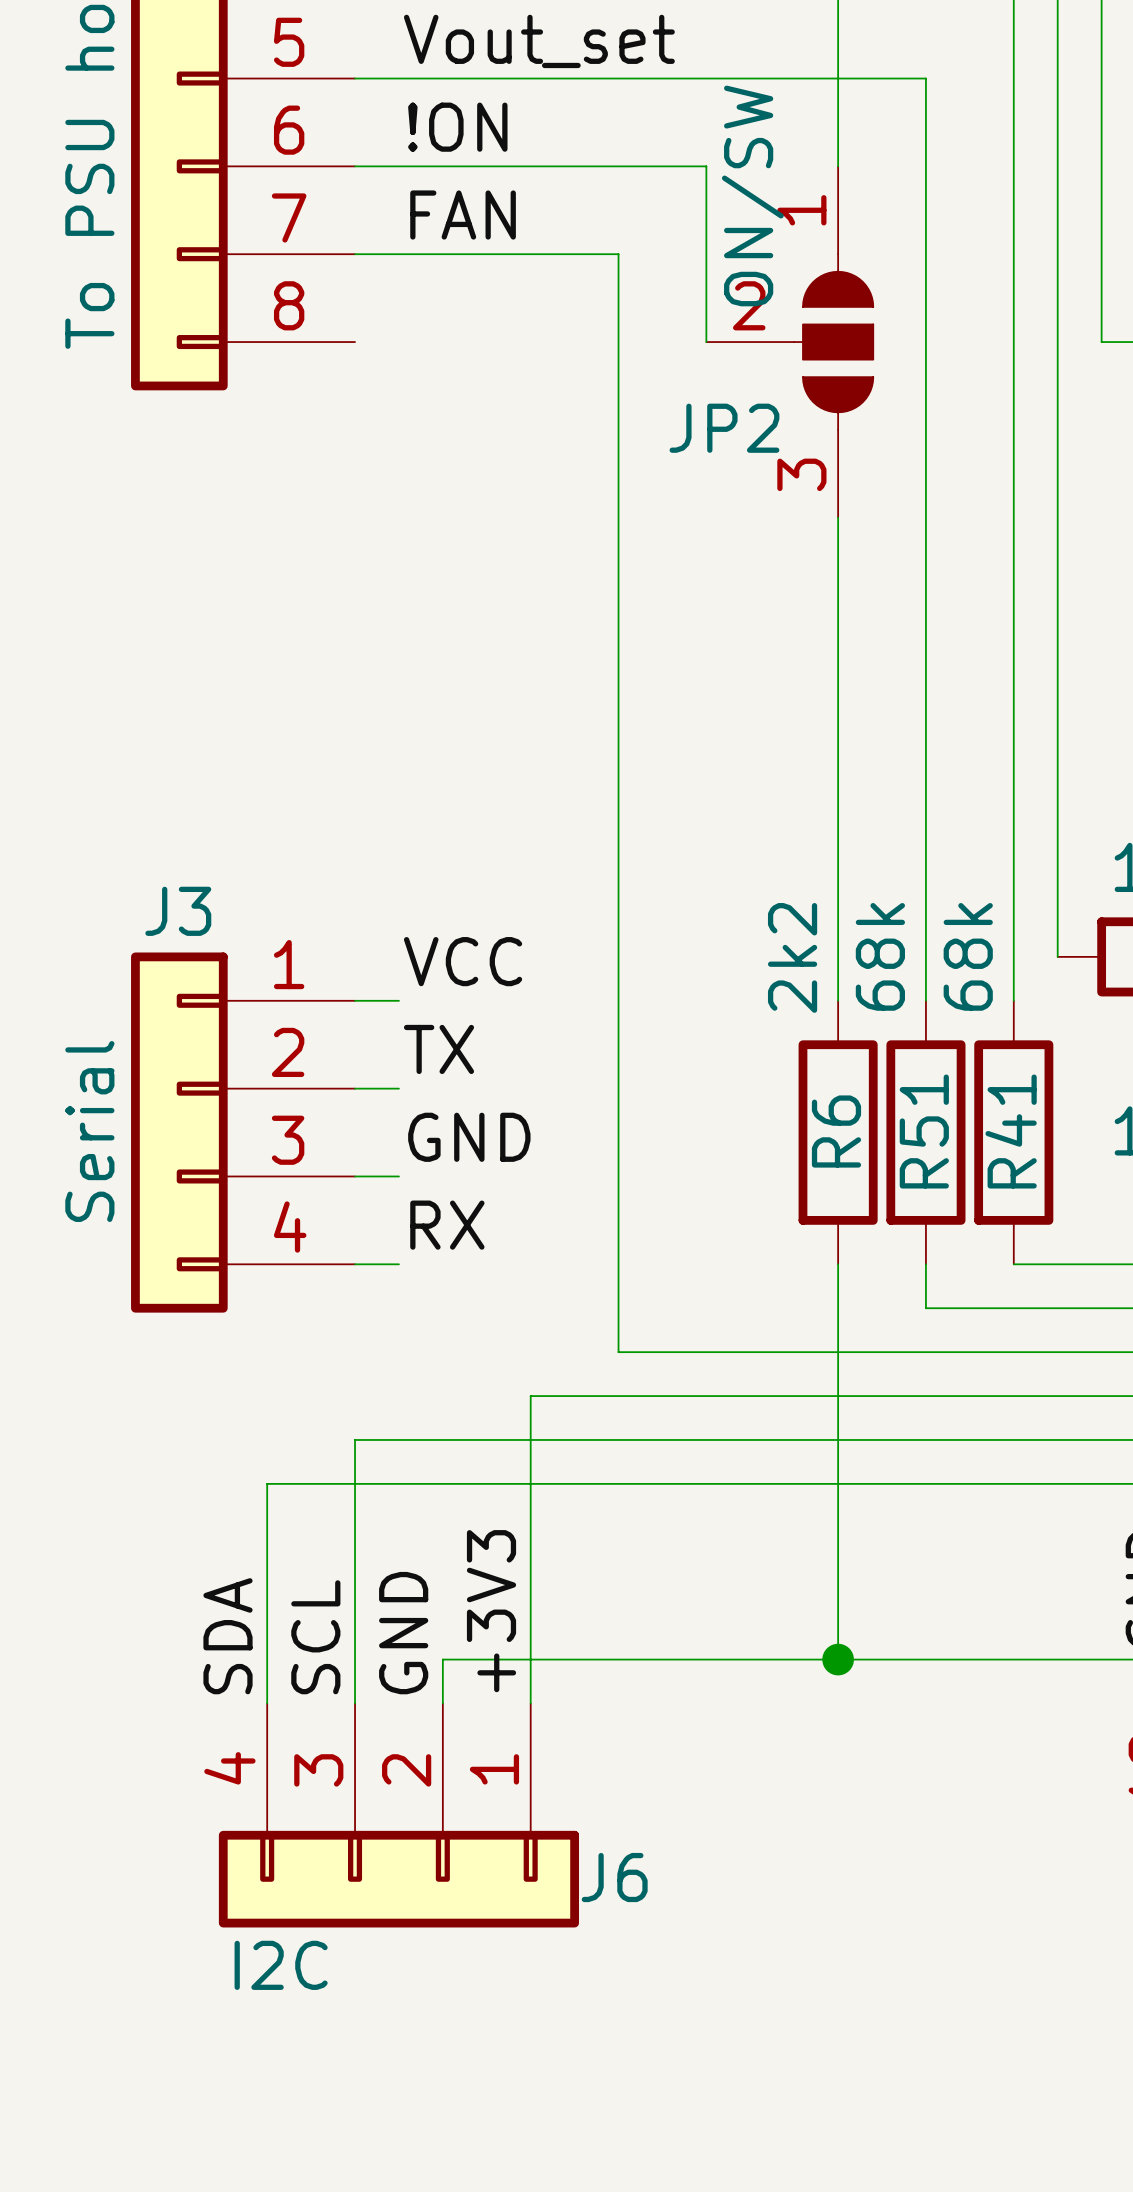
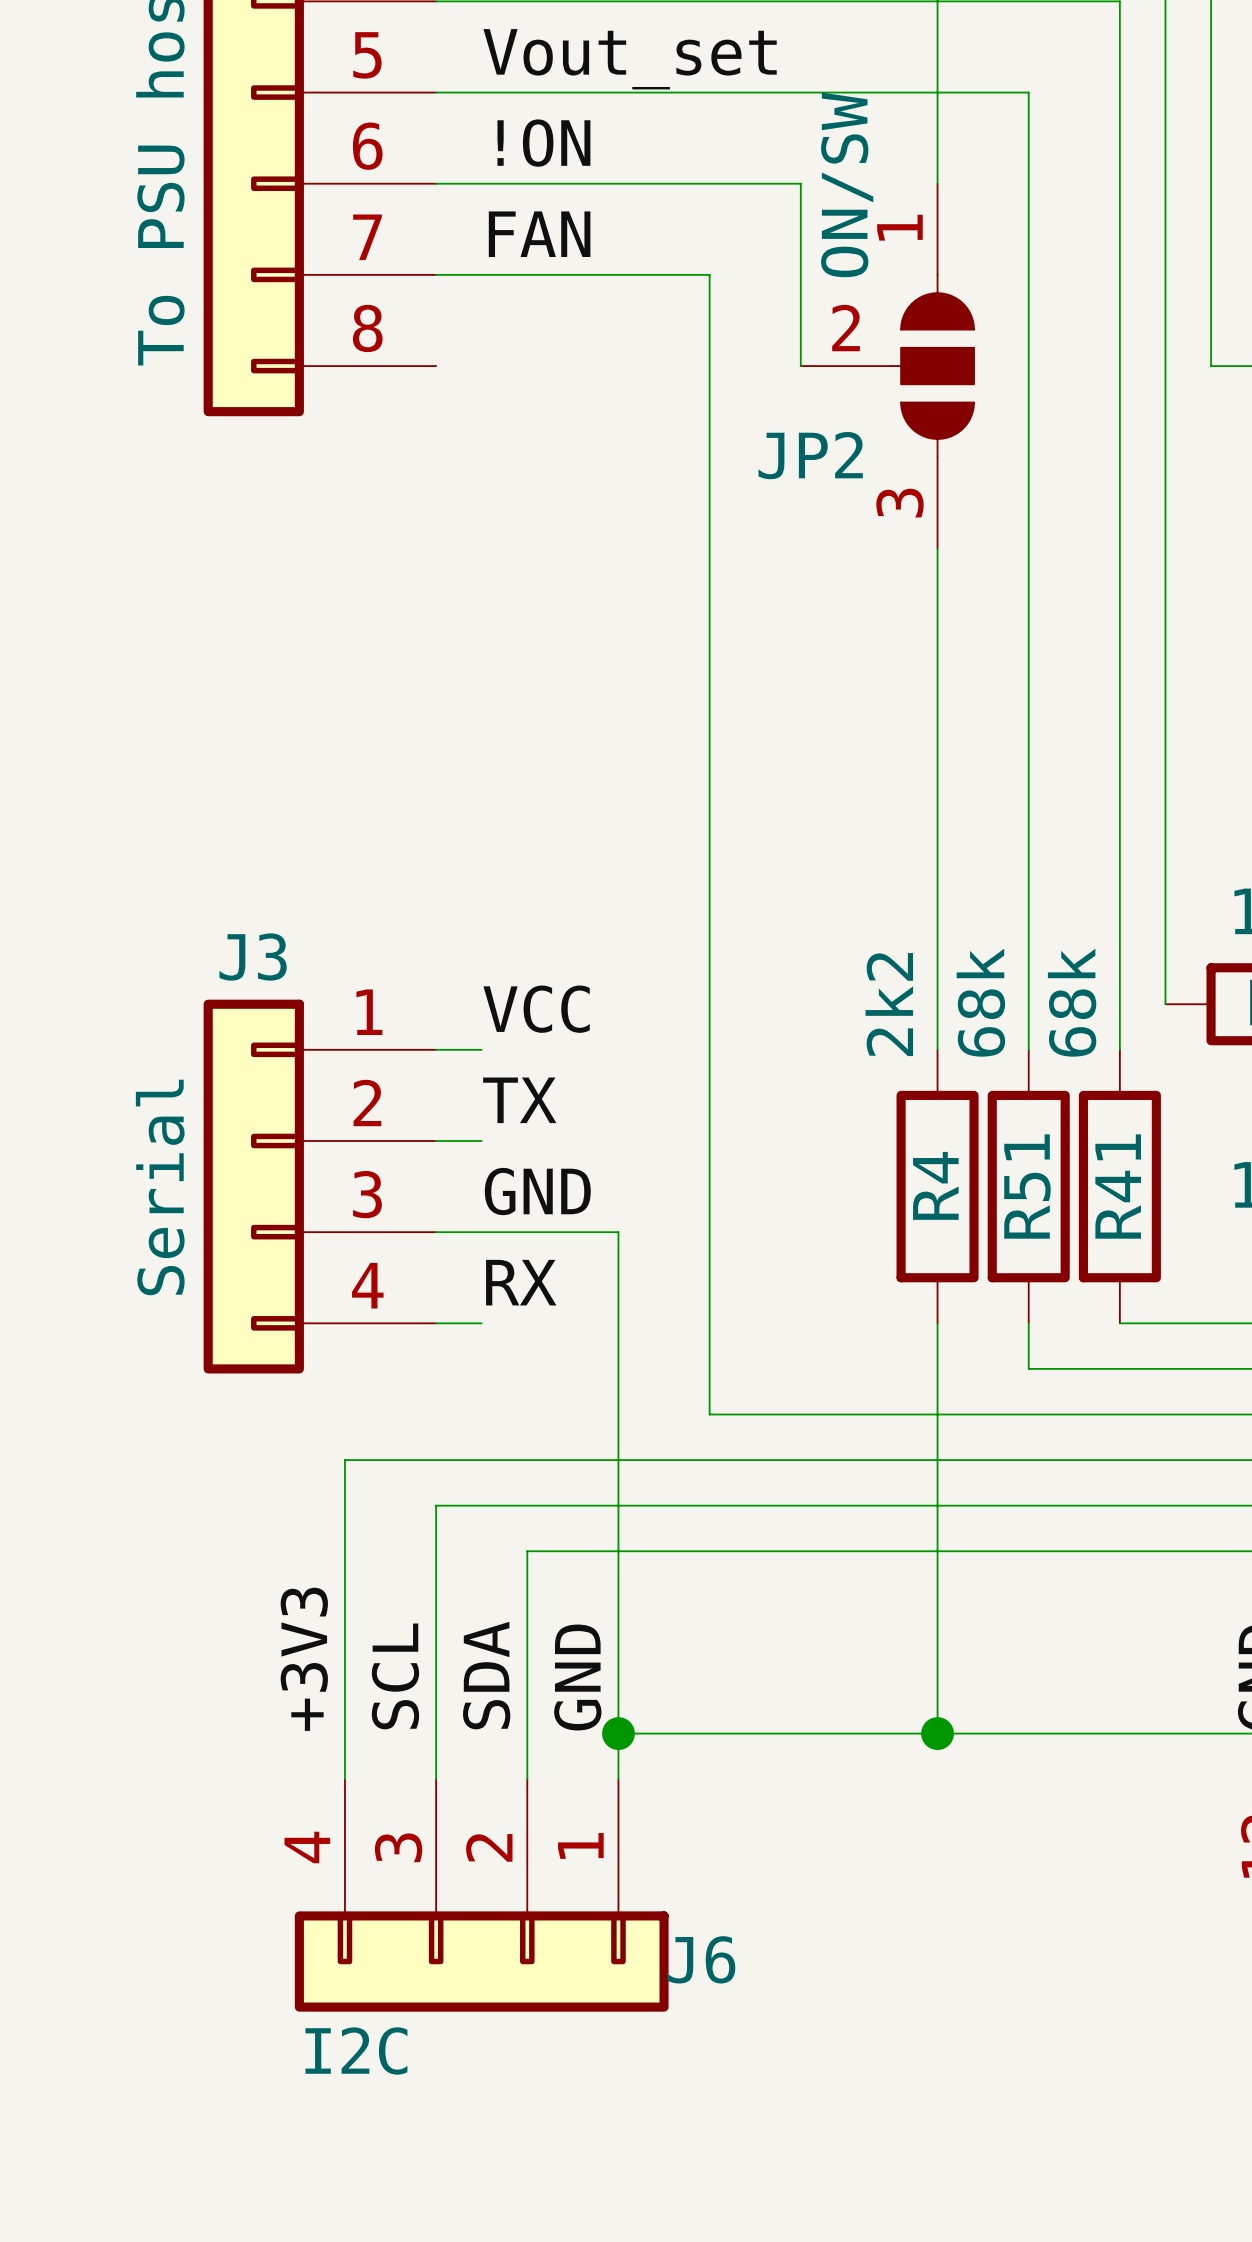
R6 name: R6 (836, 1131) -> R4 (935, 1185)
wire: (267, 1483) (442, 1483) -> (344, 1551) (344, 1460) (618, 1460) (618, 1232) (481, 1232)
label position: +3V3 (491, 1611) -> +3V3 (304, 1659)
label position: GND (403, 1633) -> GND (577, 1677)
label position: SDA (227, 1636) -> SDA (486, 1675)
label position: SCL (315, 1637) -> SCL (395, 1676)
wire: (442, 1659) (530, 1659) -> (527, 1733) (527, 1551)
junction: none -> (618, 1733)

